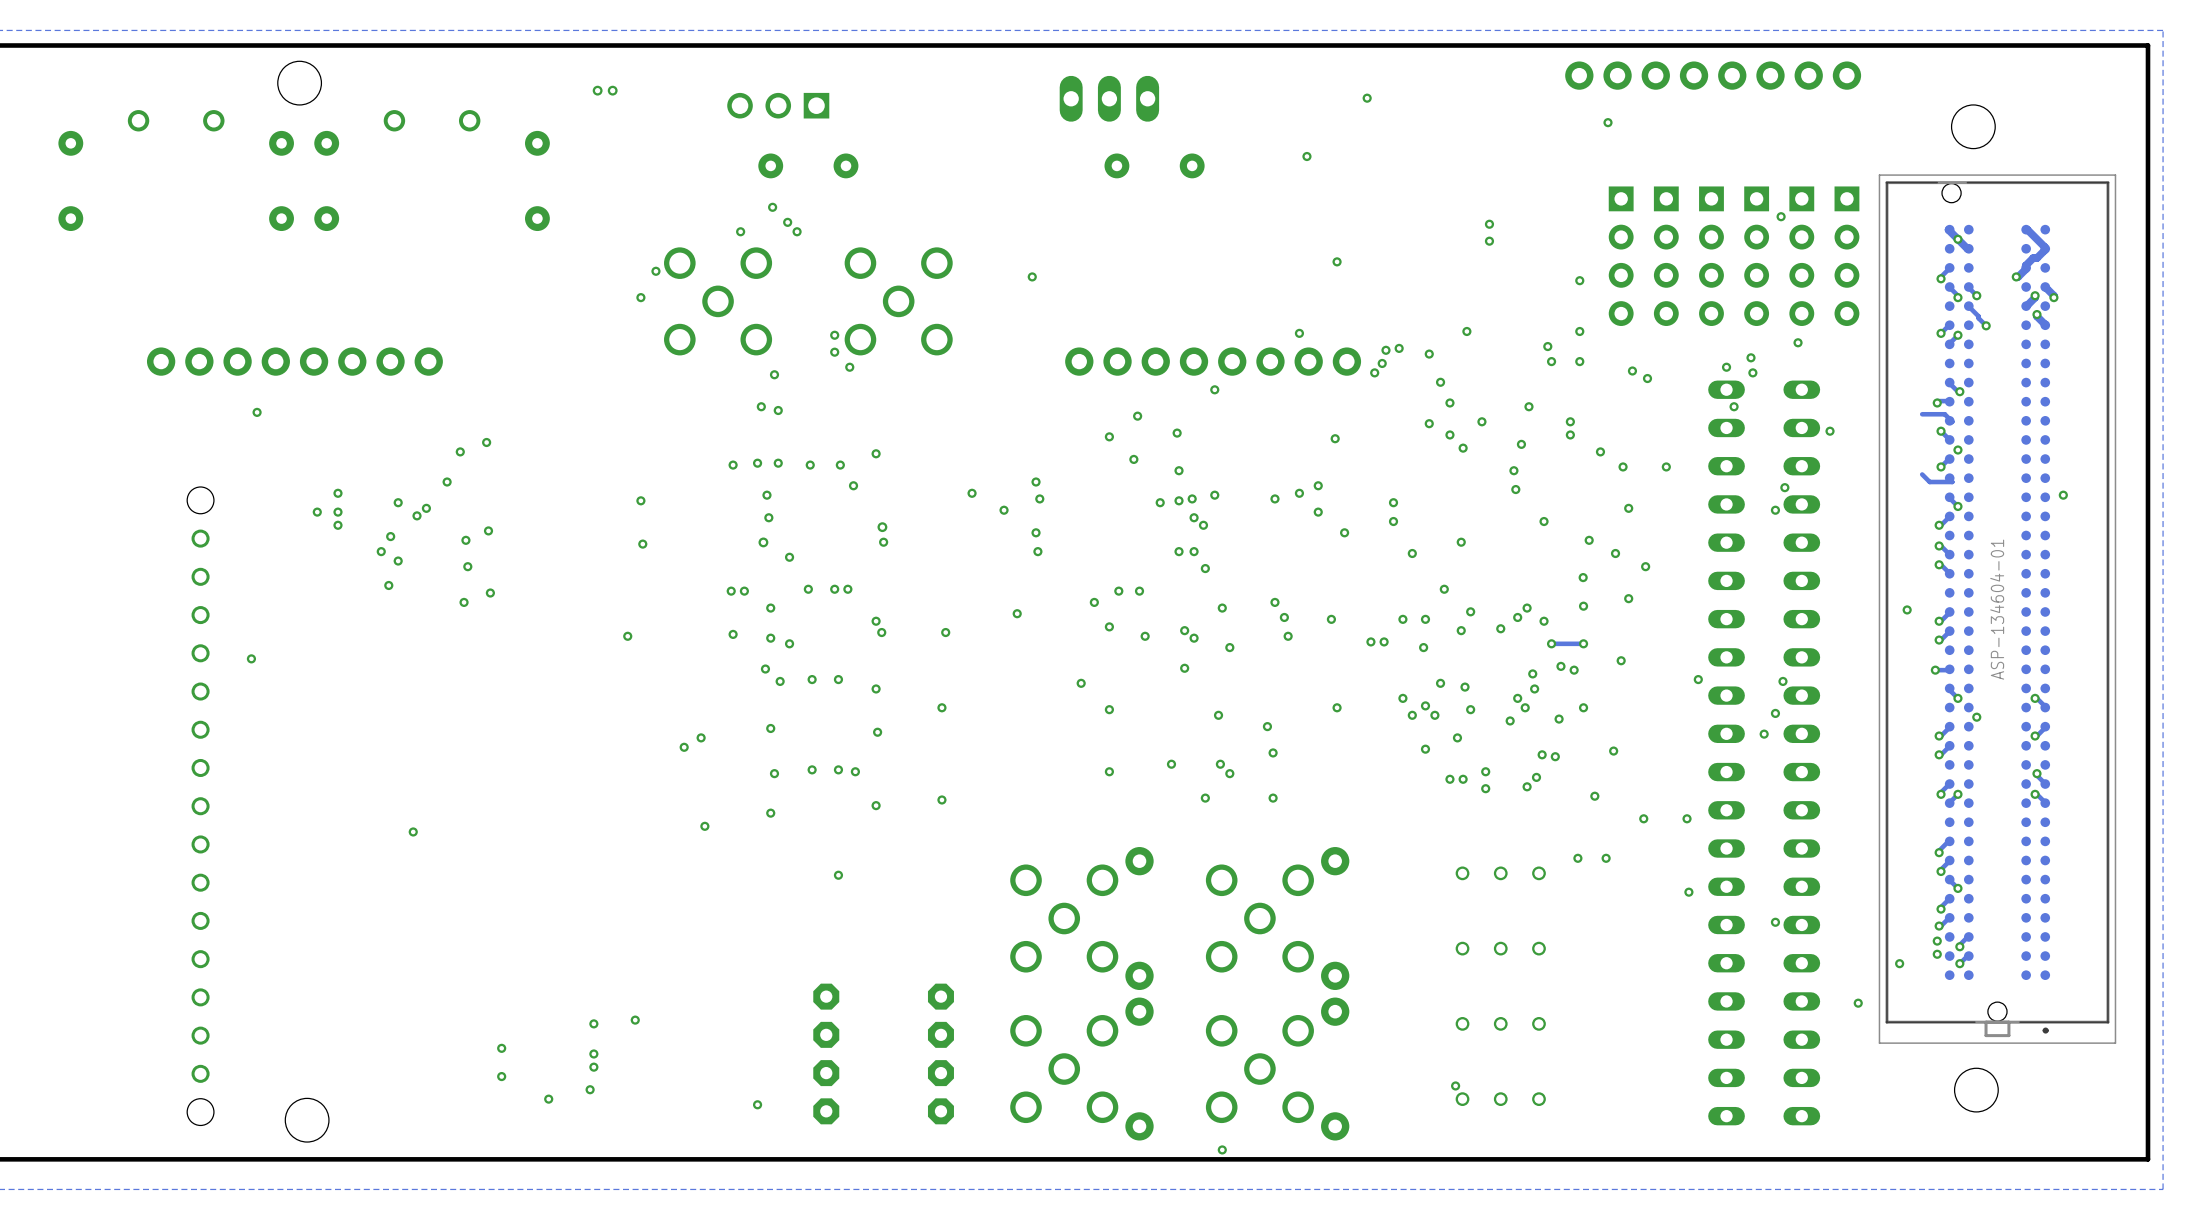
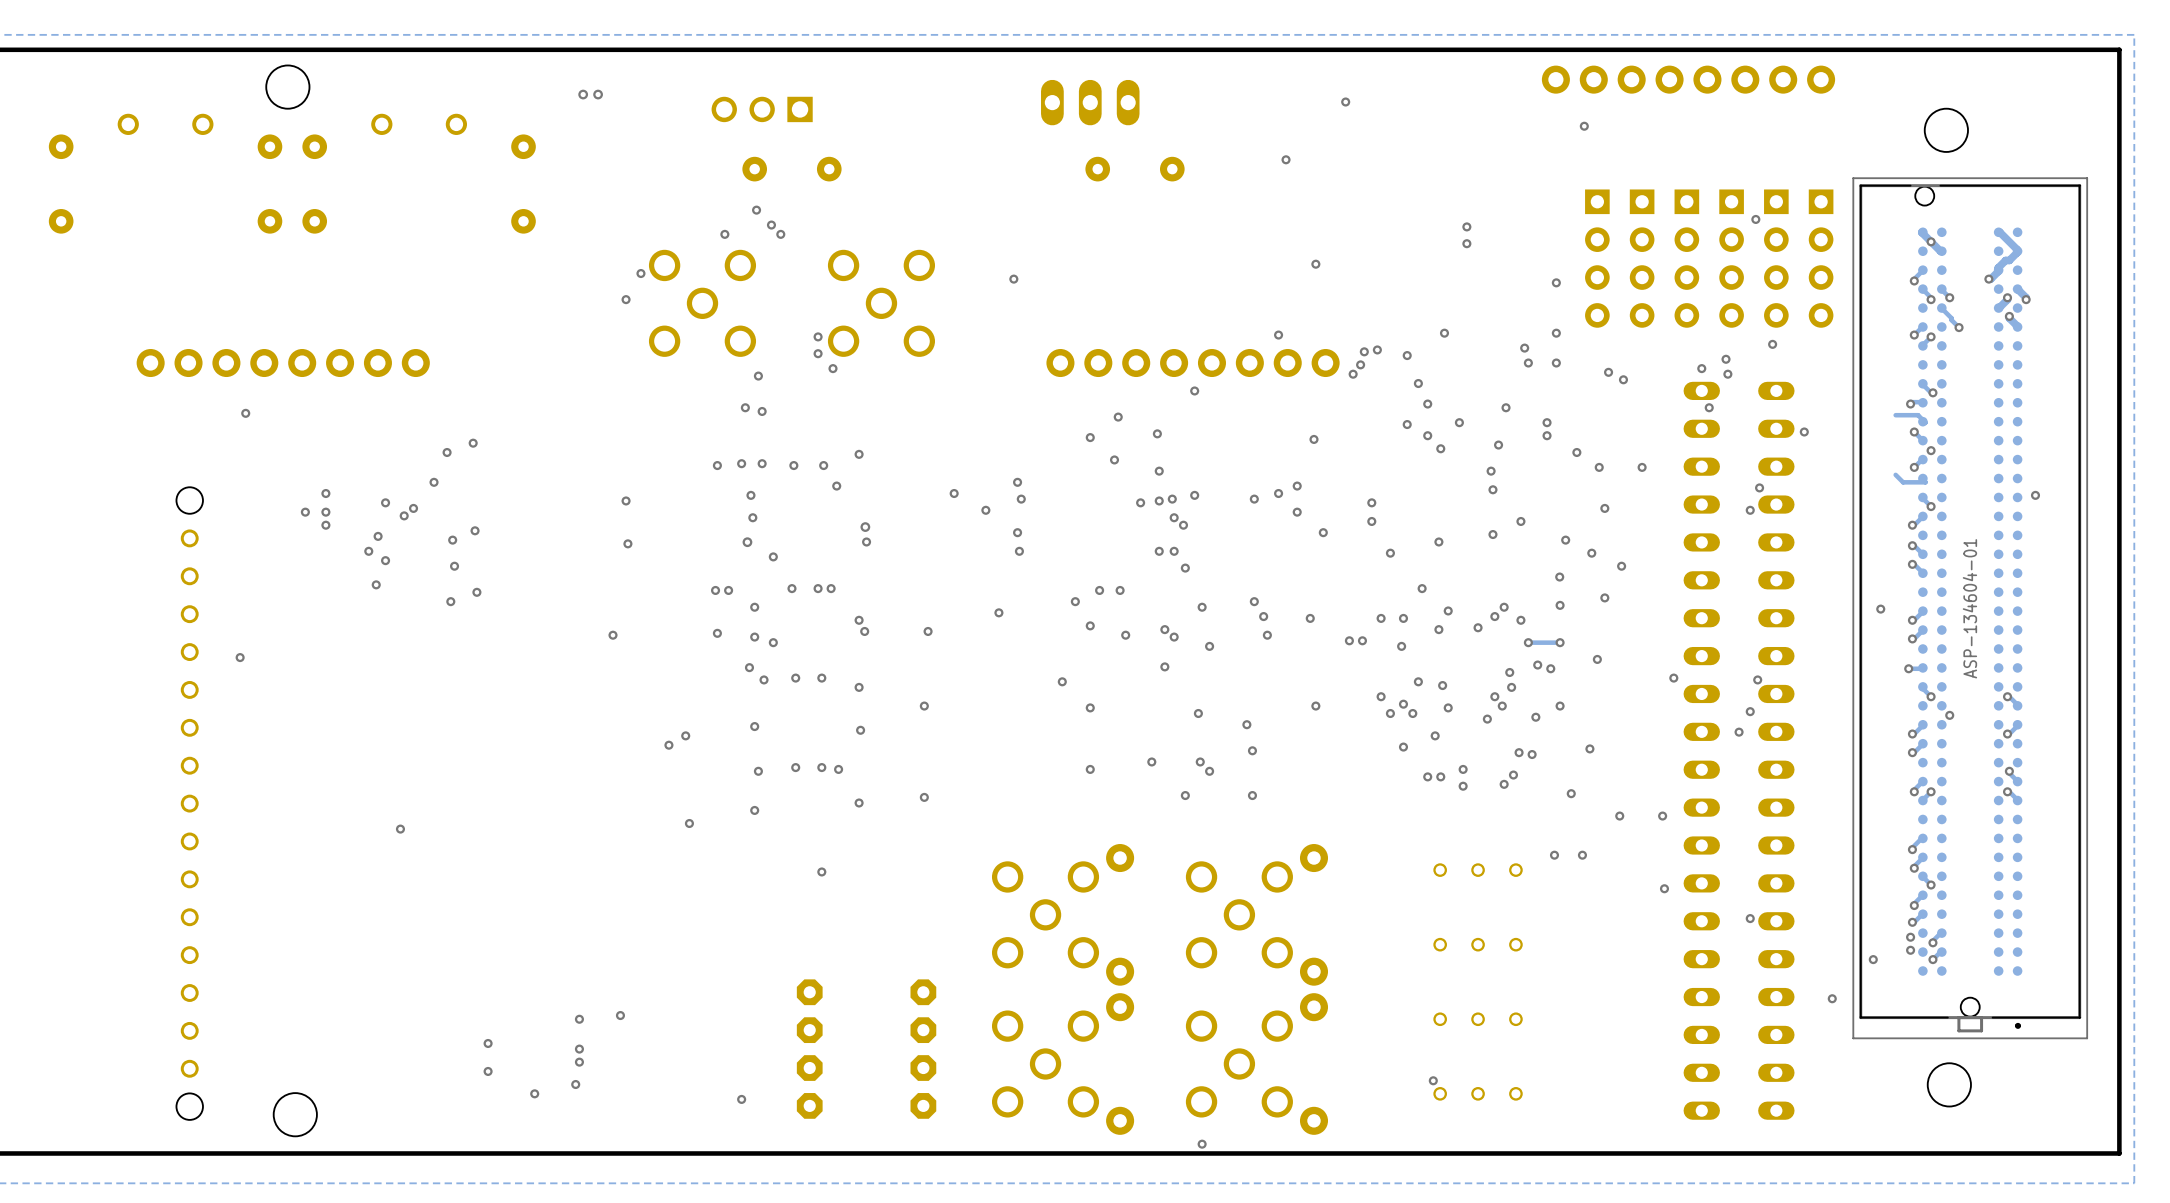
via: none -> (1492, 534)

